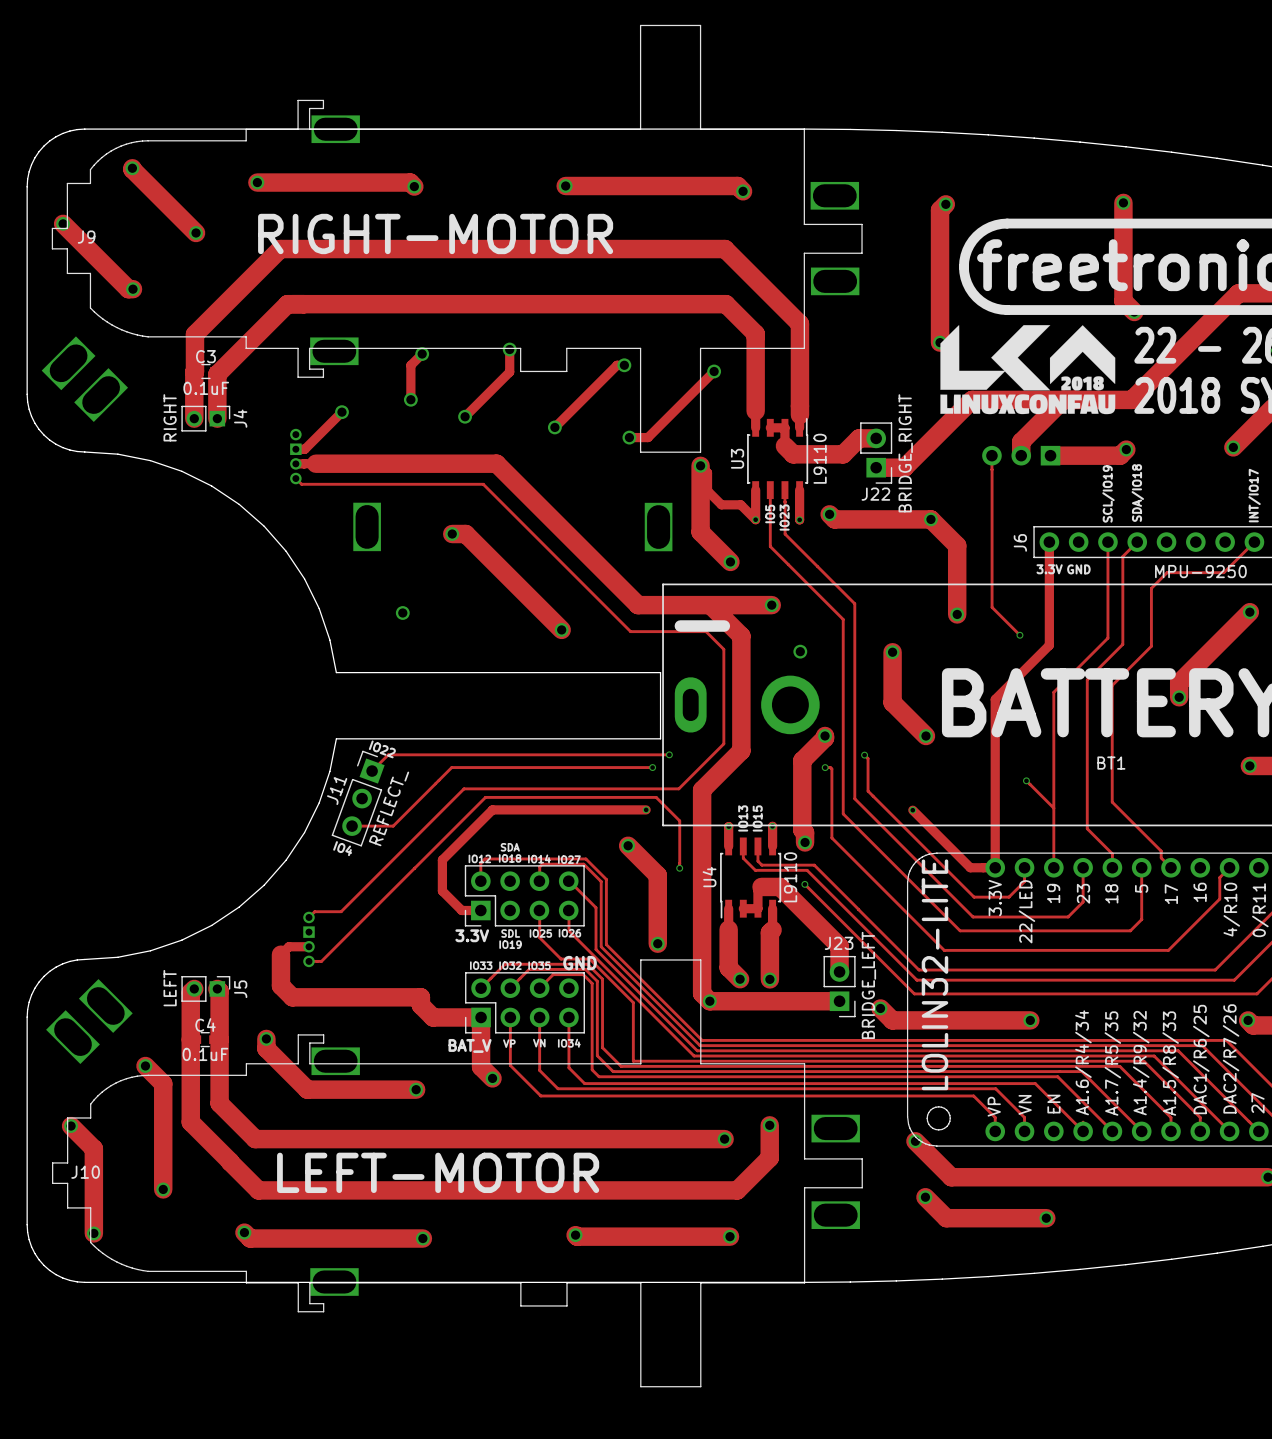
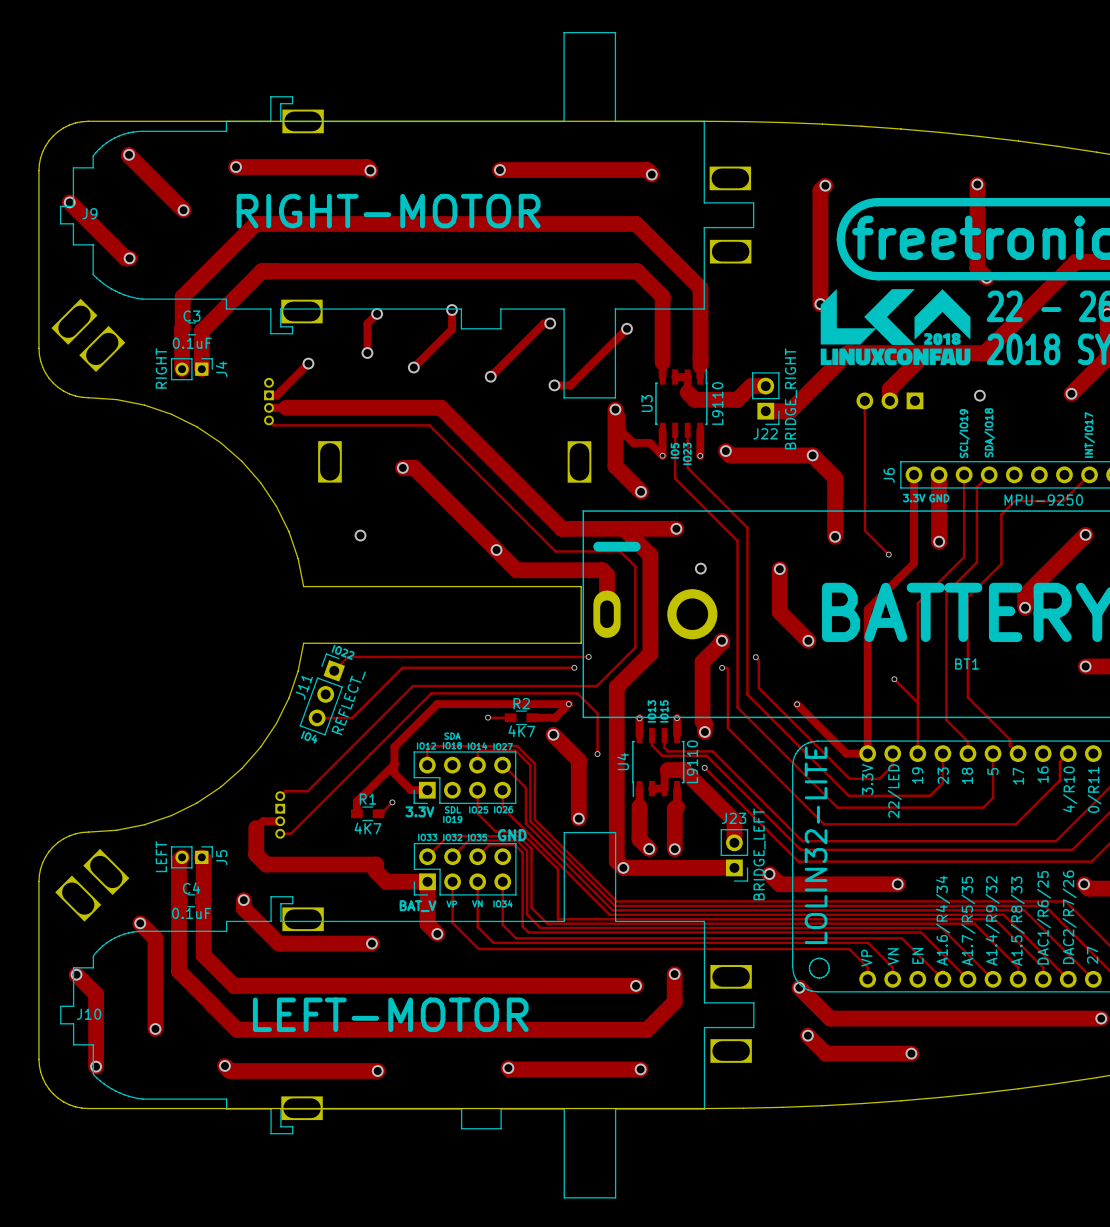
track: (1126, 449) (1120, 455) (1050, 455) -> none
track: none -> (939, 474) (939, 541)
via: none -> (939, 541)
track: none -> (496, 550) (516, 570) (602, 570) (606, 574) (606, 614)
track: none -> (568, 704) (555, 717) (532, 717)
track: none -> (488, 717) (510, 717)
via: none -> (488, 717)
R2: none -> 4K7 (521, 717)
track: none -> (394, 764) (356, 801) (356, 813)
track: none -> (392, 802) (381, 813) (378, 813)
via: none -> (392, 802)
R1: none -> 4K7 (367, 813)

